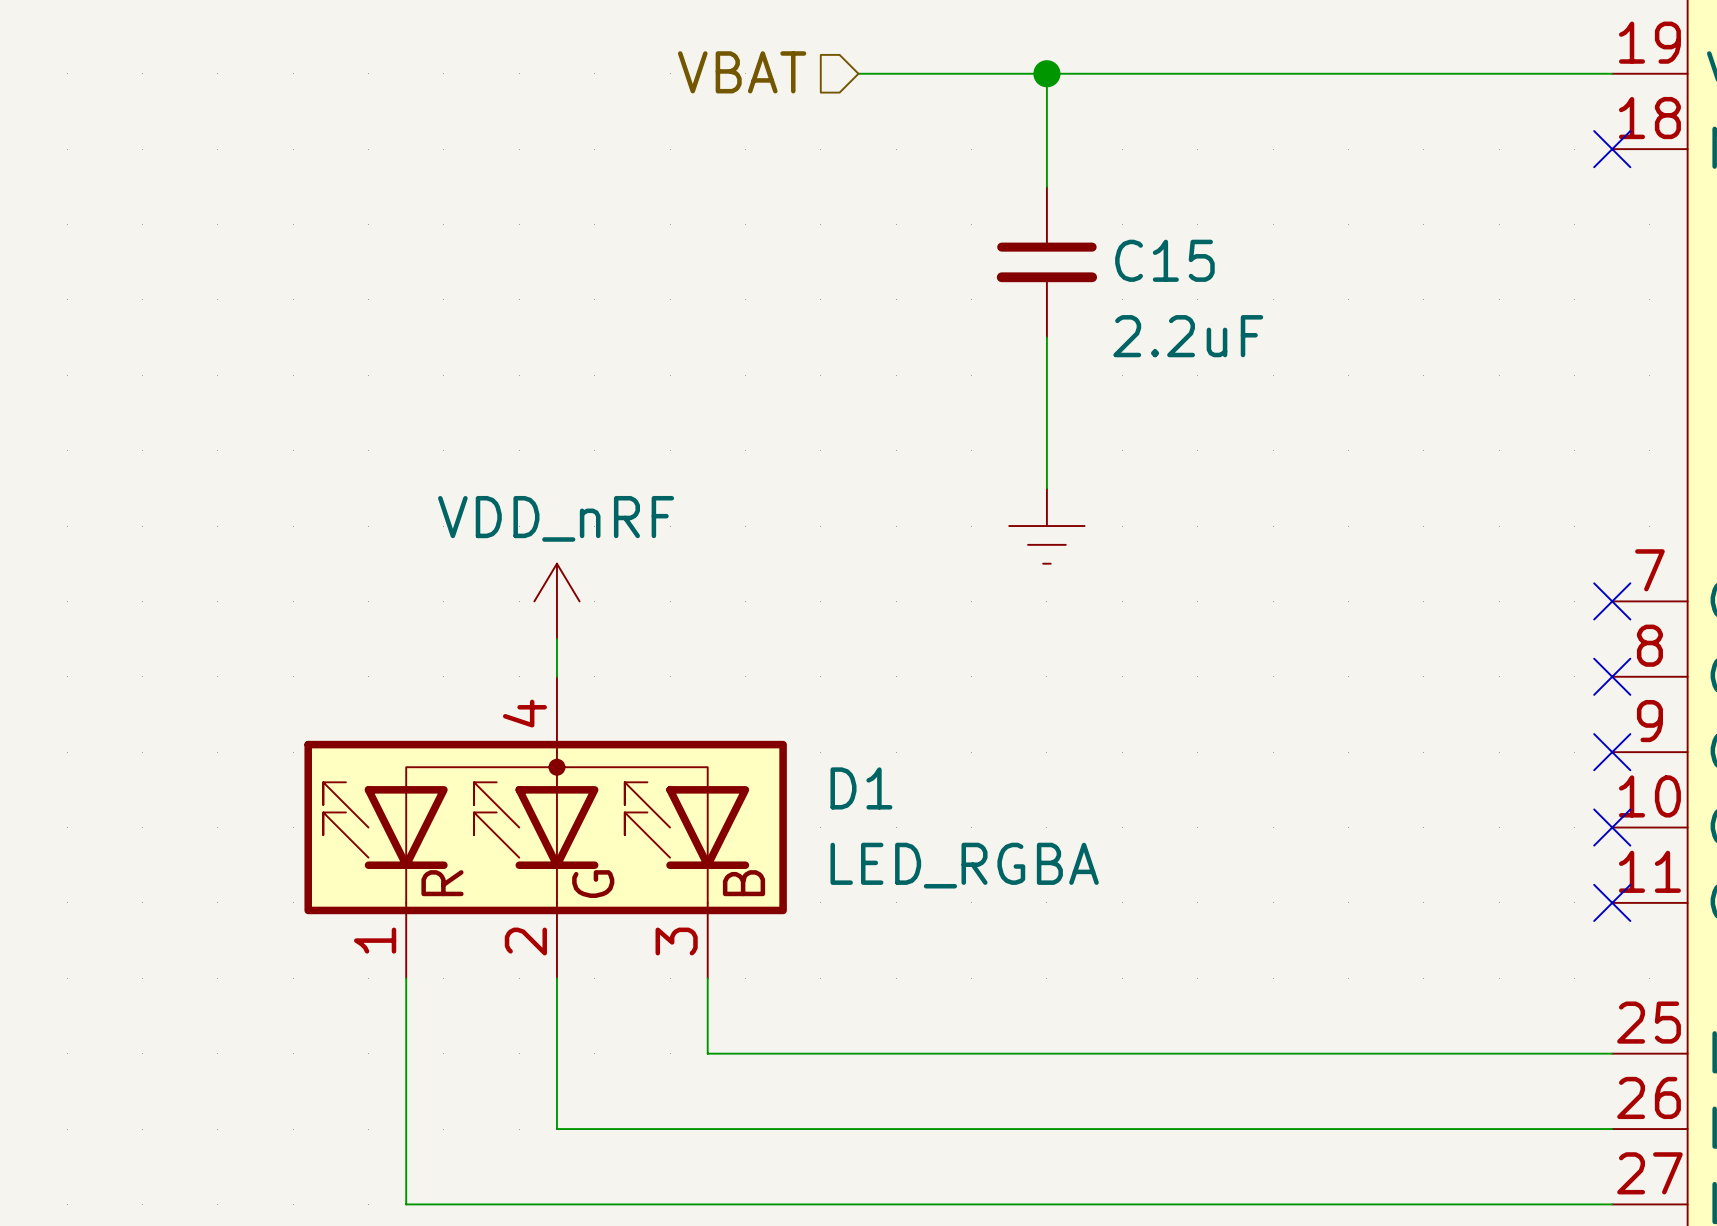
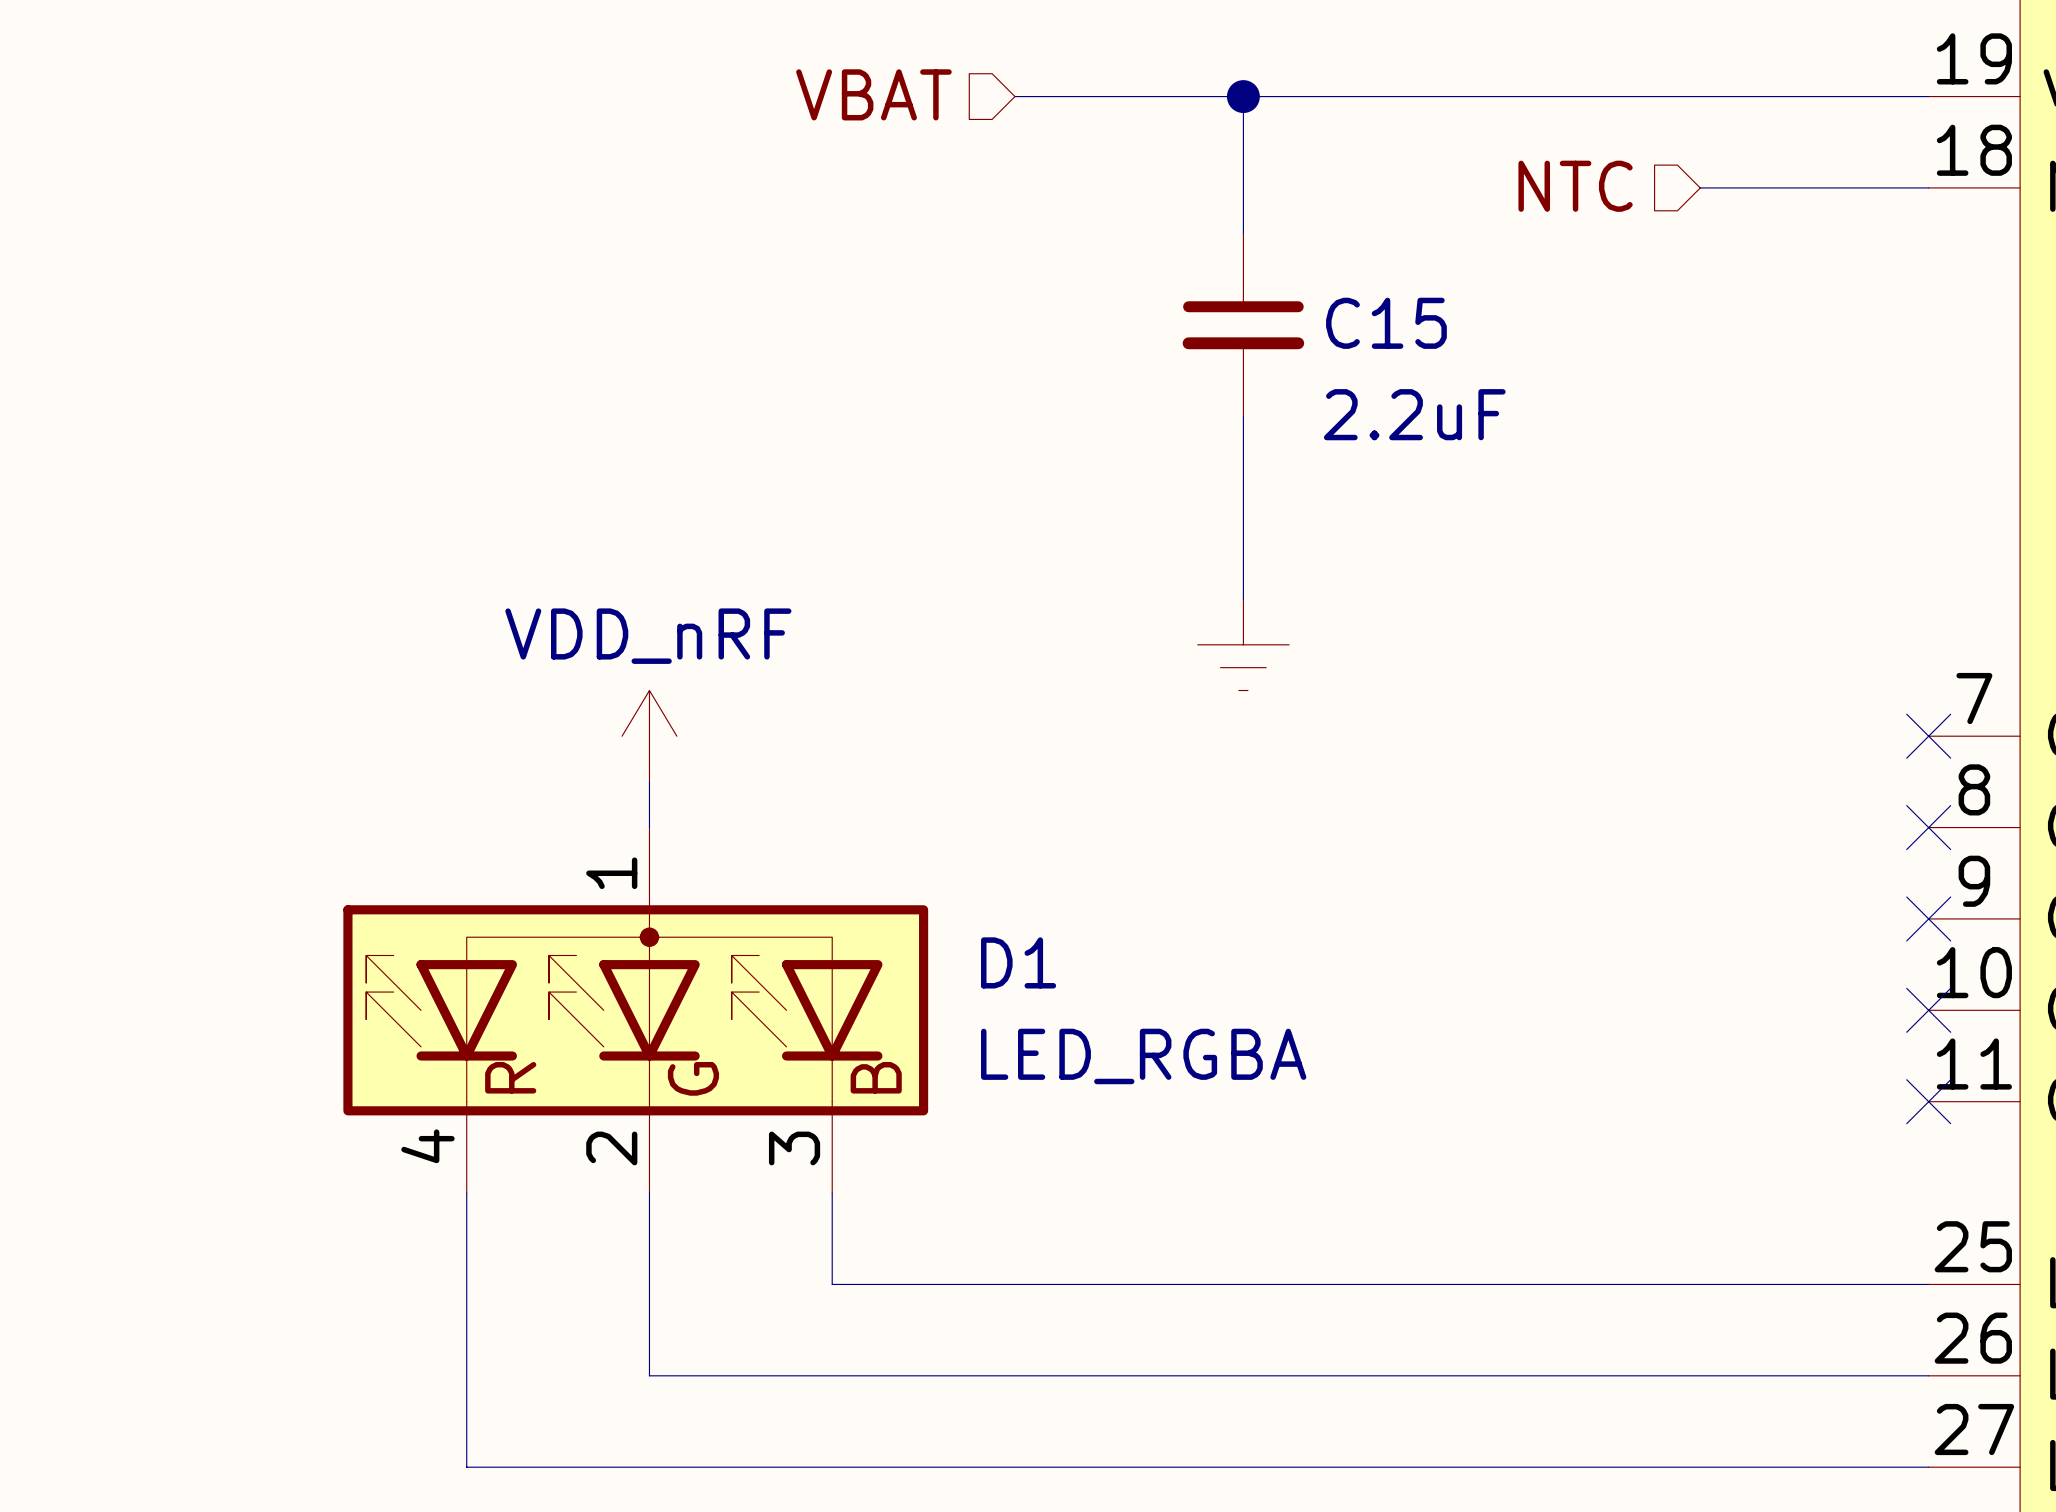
hierarchical label: none -> NTC (1575, 186)
wire: none -> (1700, 187) (1928, 187)
no-connect mark: (1612, 149) -> none
D1 pin number: 4 (524, 713) -> 1 (611, 873)
D1 pin number: 1 (375, 940) -> 4 (427, 1146)

